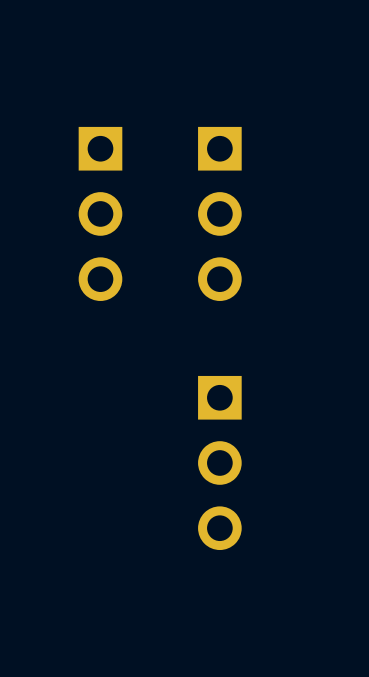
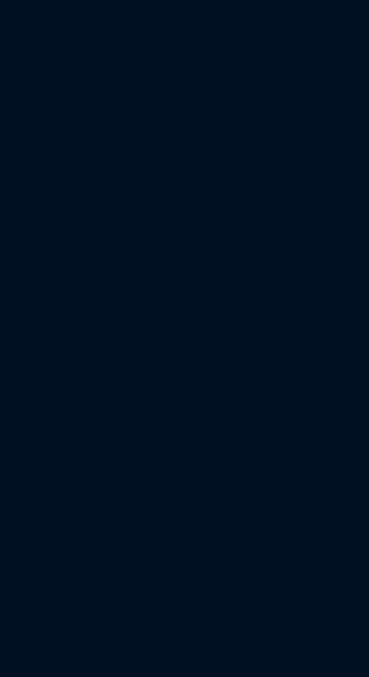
part: (100, 213) -> none
part: (219, 213) -> none
part: (219, 462) -> none

